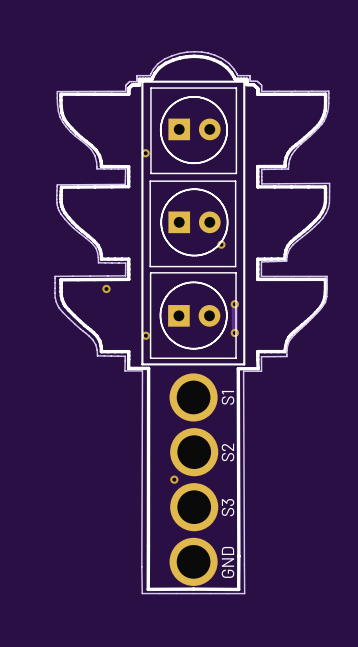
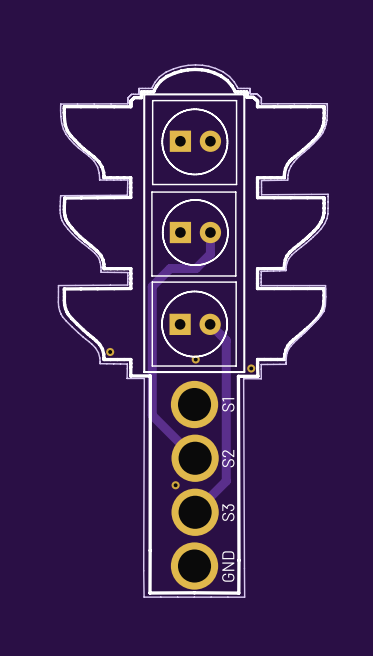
via: (145, 153) -> none
track: none -> (210, 232) (210, 254) (196, 268) (170, 268) (152, 286) (152, 415) (195, 458)
via: (221, 244) -> none
via: (106, 288) -> none
track: (234, 304) (234, 332) -> none
via: (234, 304) -> none
track: none -> (210, 324) (226, 340) (226, 481) (195, 512)
via: (234, 332) -> none
via: (145, 335) -> none
via: none -> (110, 351)
via: none -> (195, 359)
via: none -> (251, 368)

